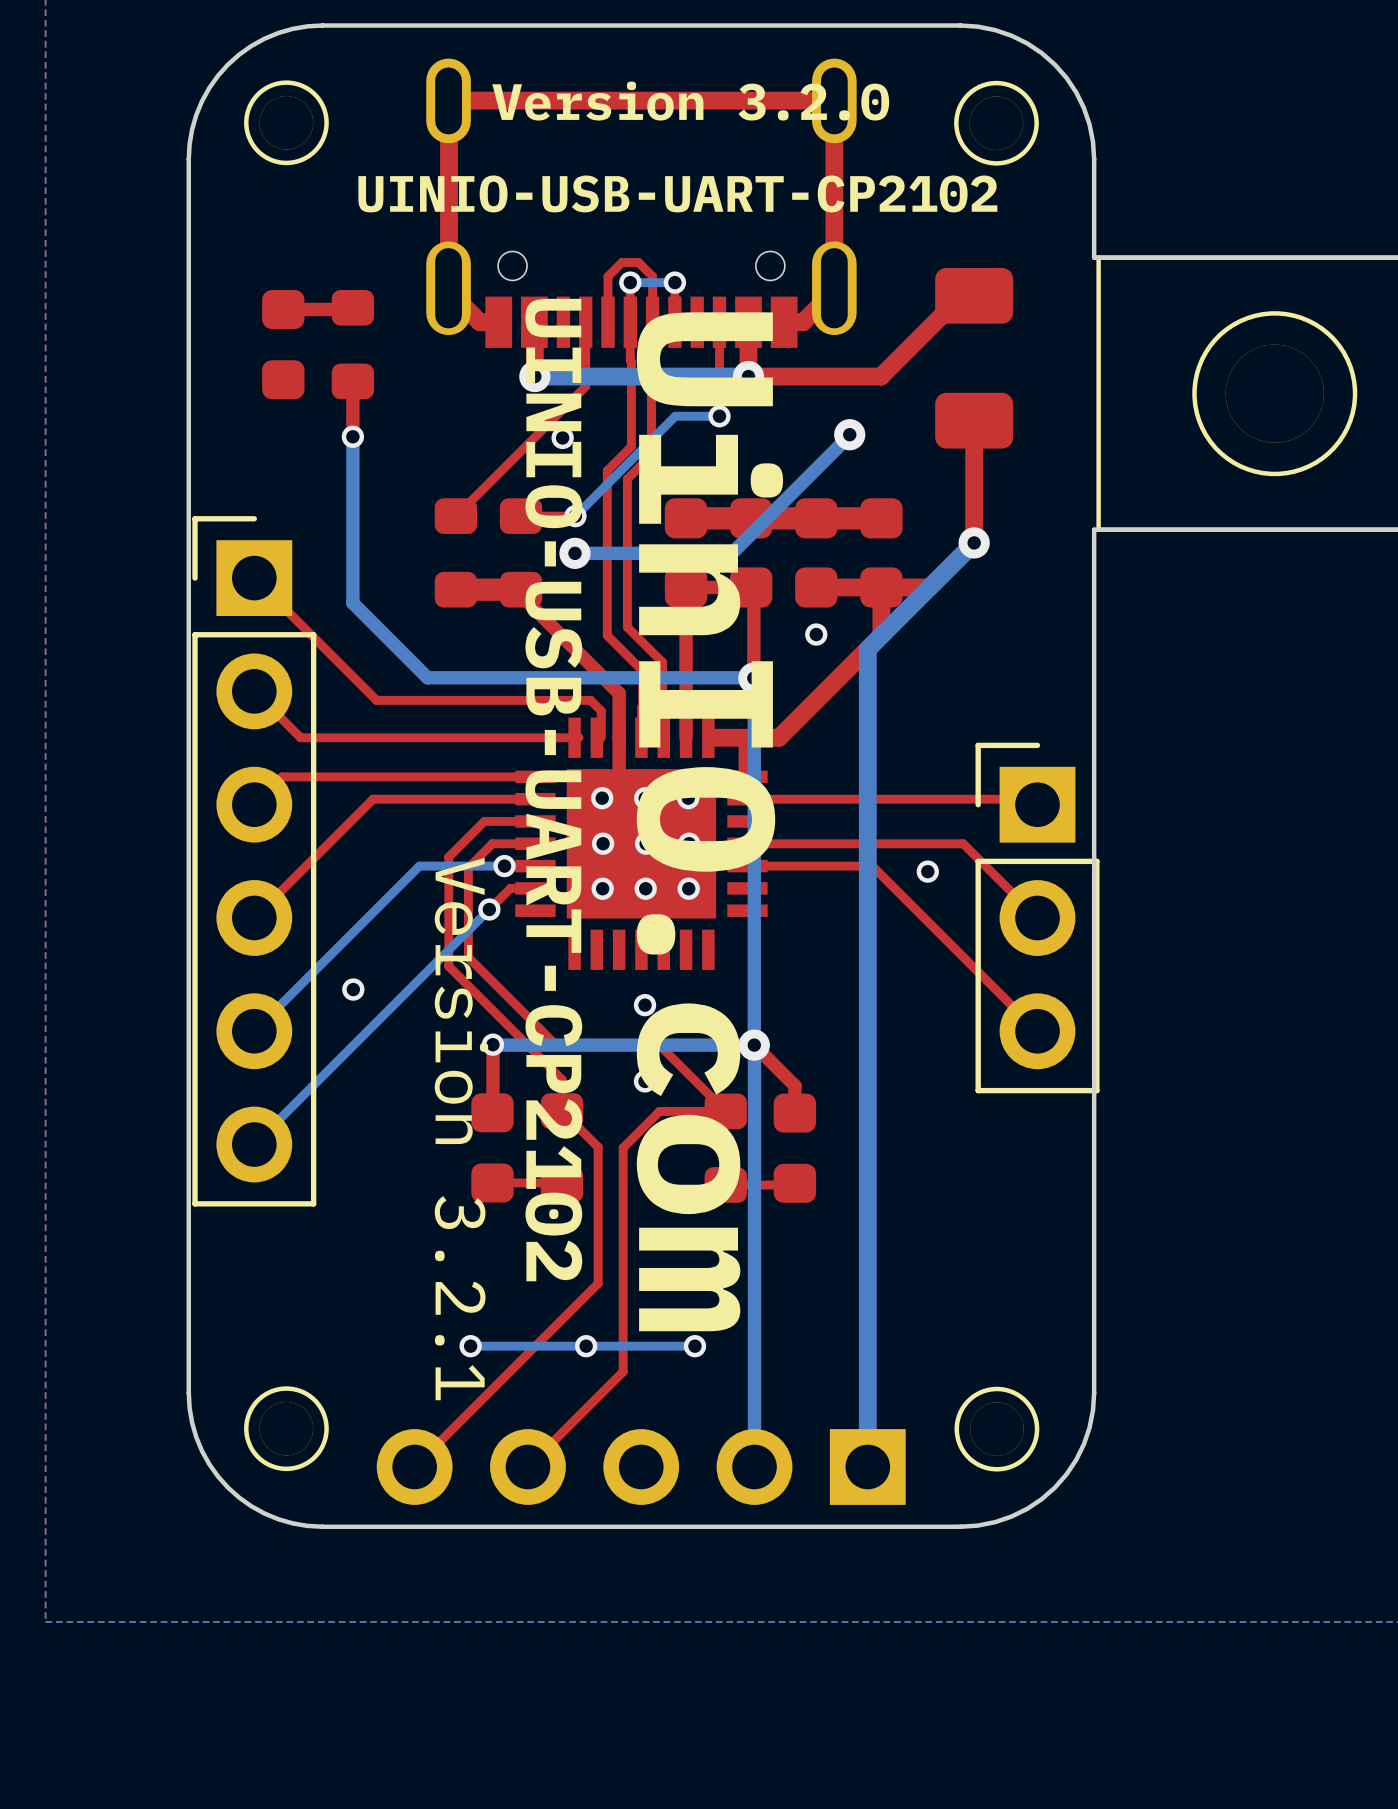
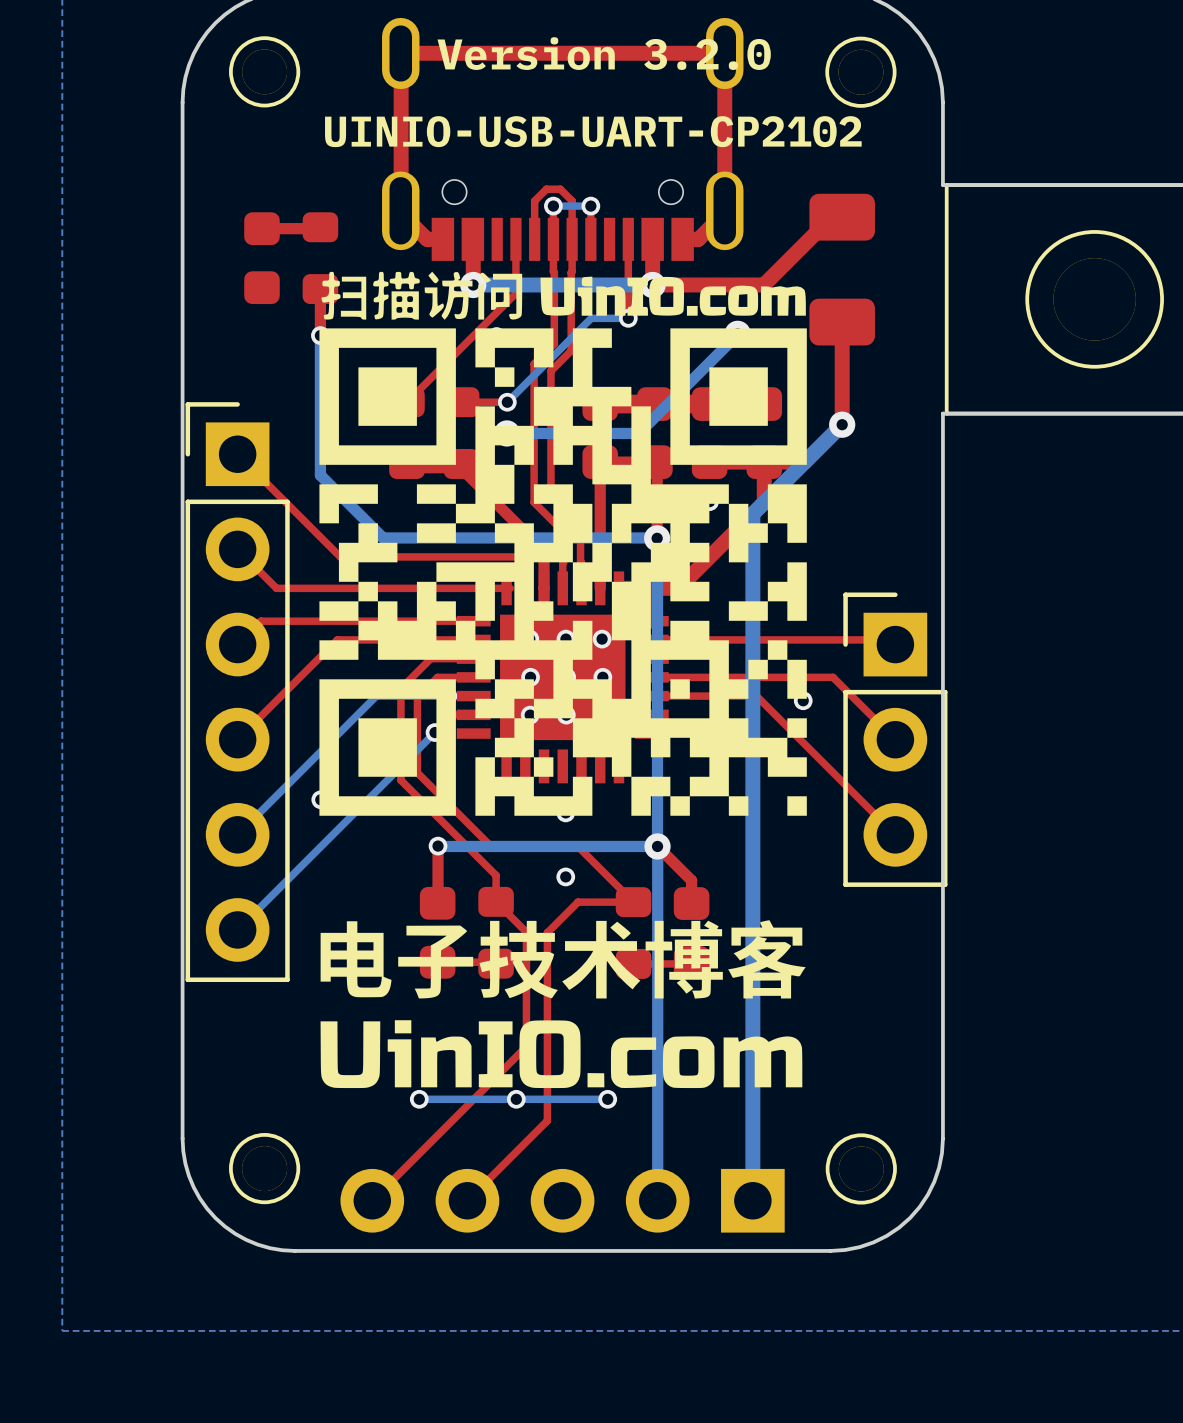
drawing: none -> [319, 271, 807, 816]
text: UINIO-USB-UART-CP2102 (553, 790) -> none
text: UinIO.com (709, 821) -> none
text: Version 3.2.1 (461, 1129) -> none
drawing: none -> [320, 920, 806, 1089]

